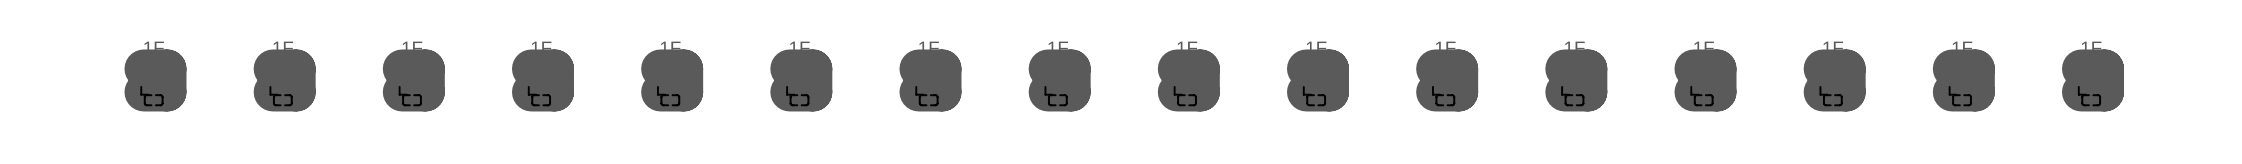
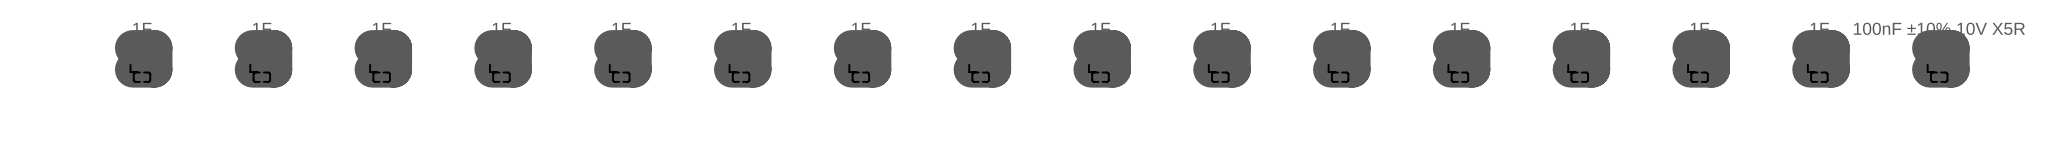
part value: 1F (2091, 48) -> 100nF ±10% 10V X5R (1939, 28)

